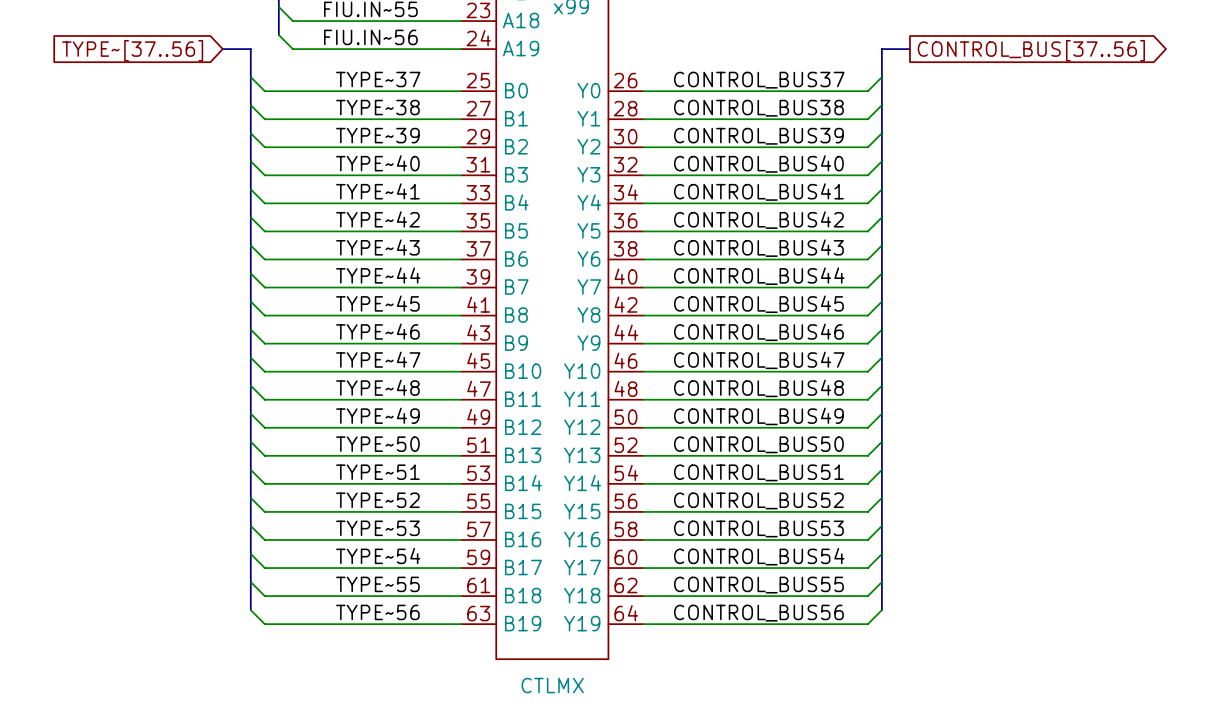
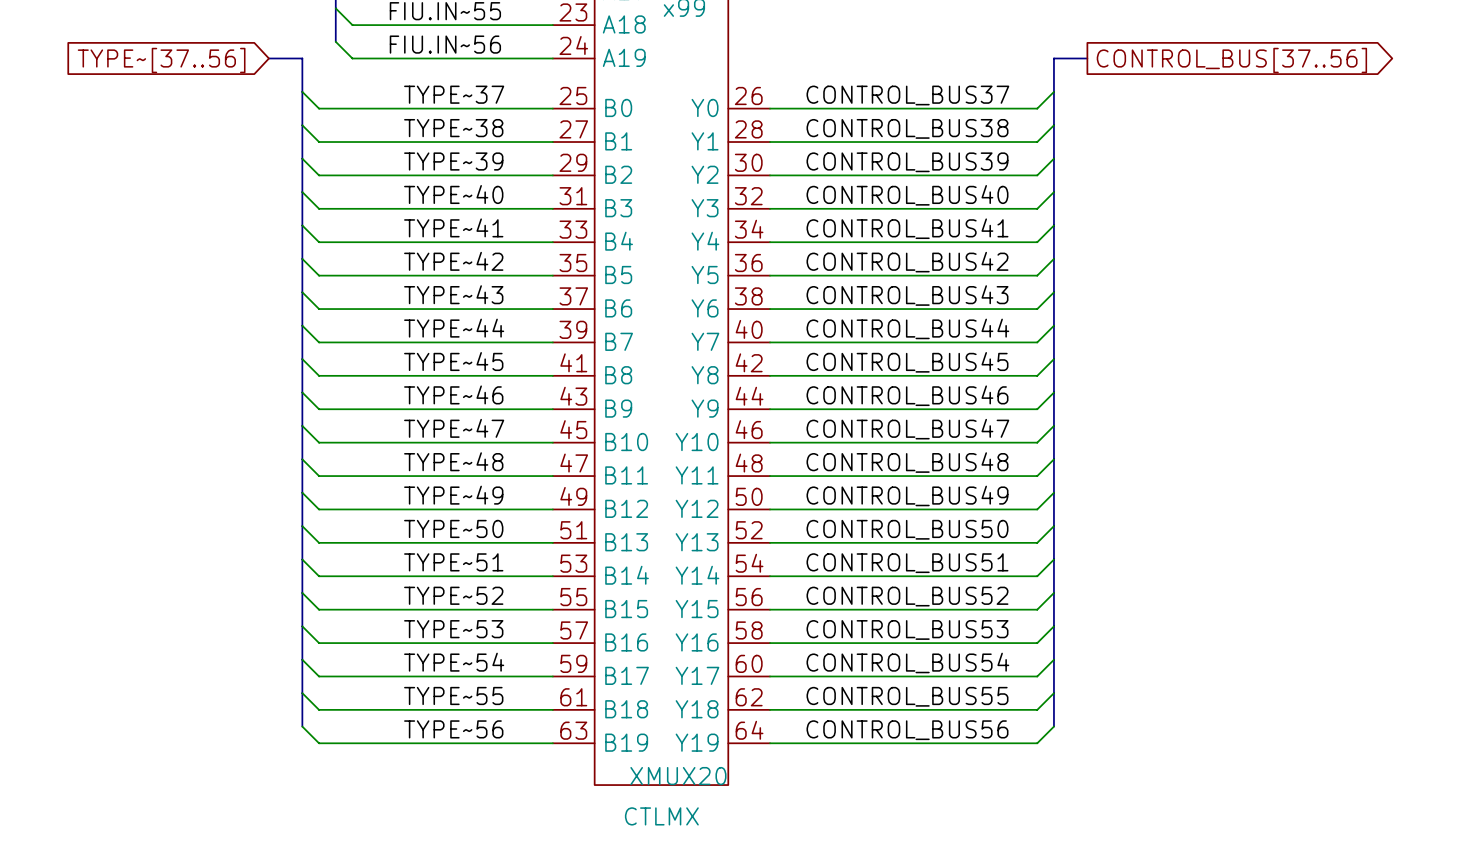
part value: none -> XMUX20 (678, 776)

